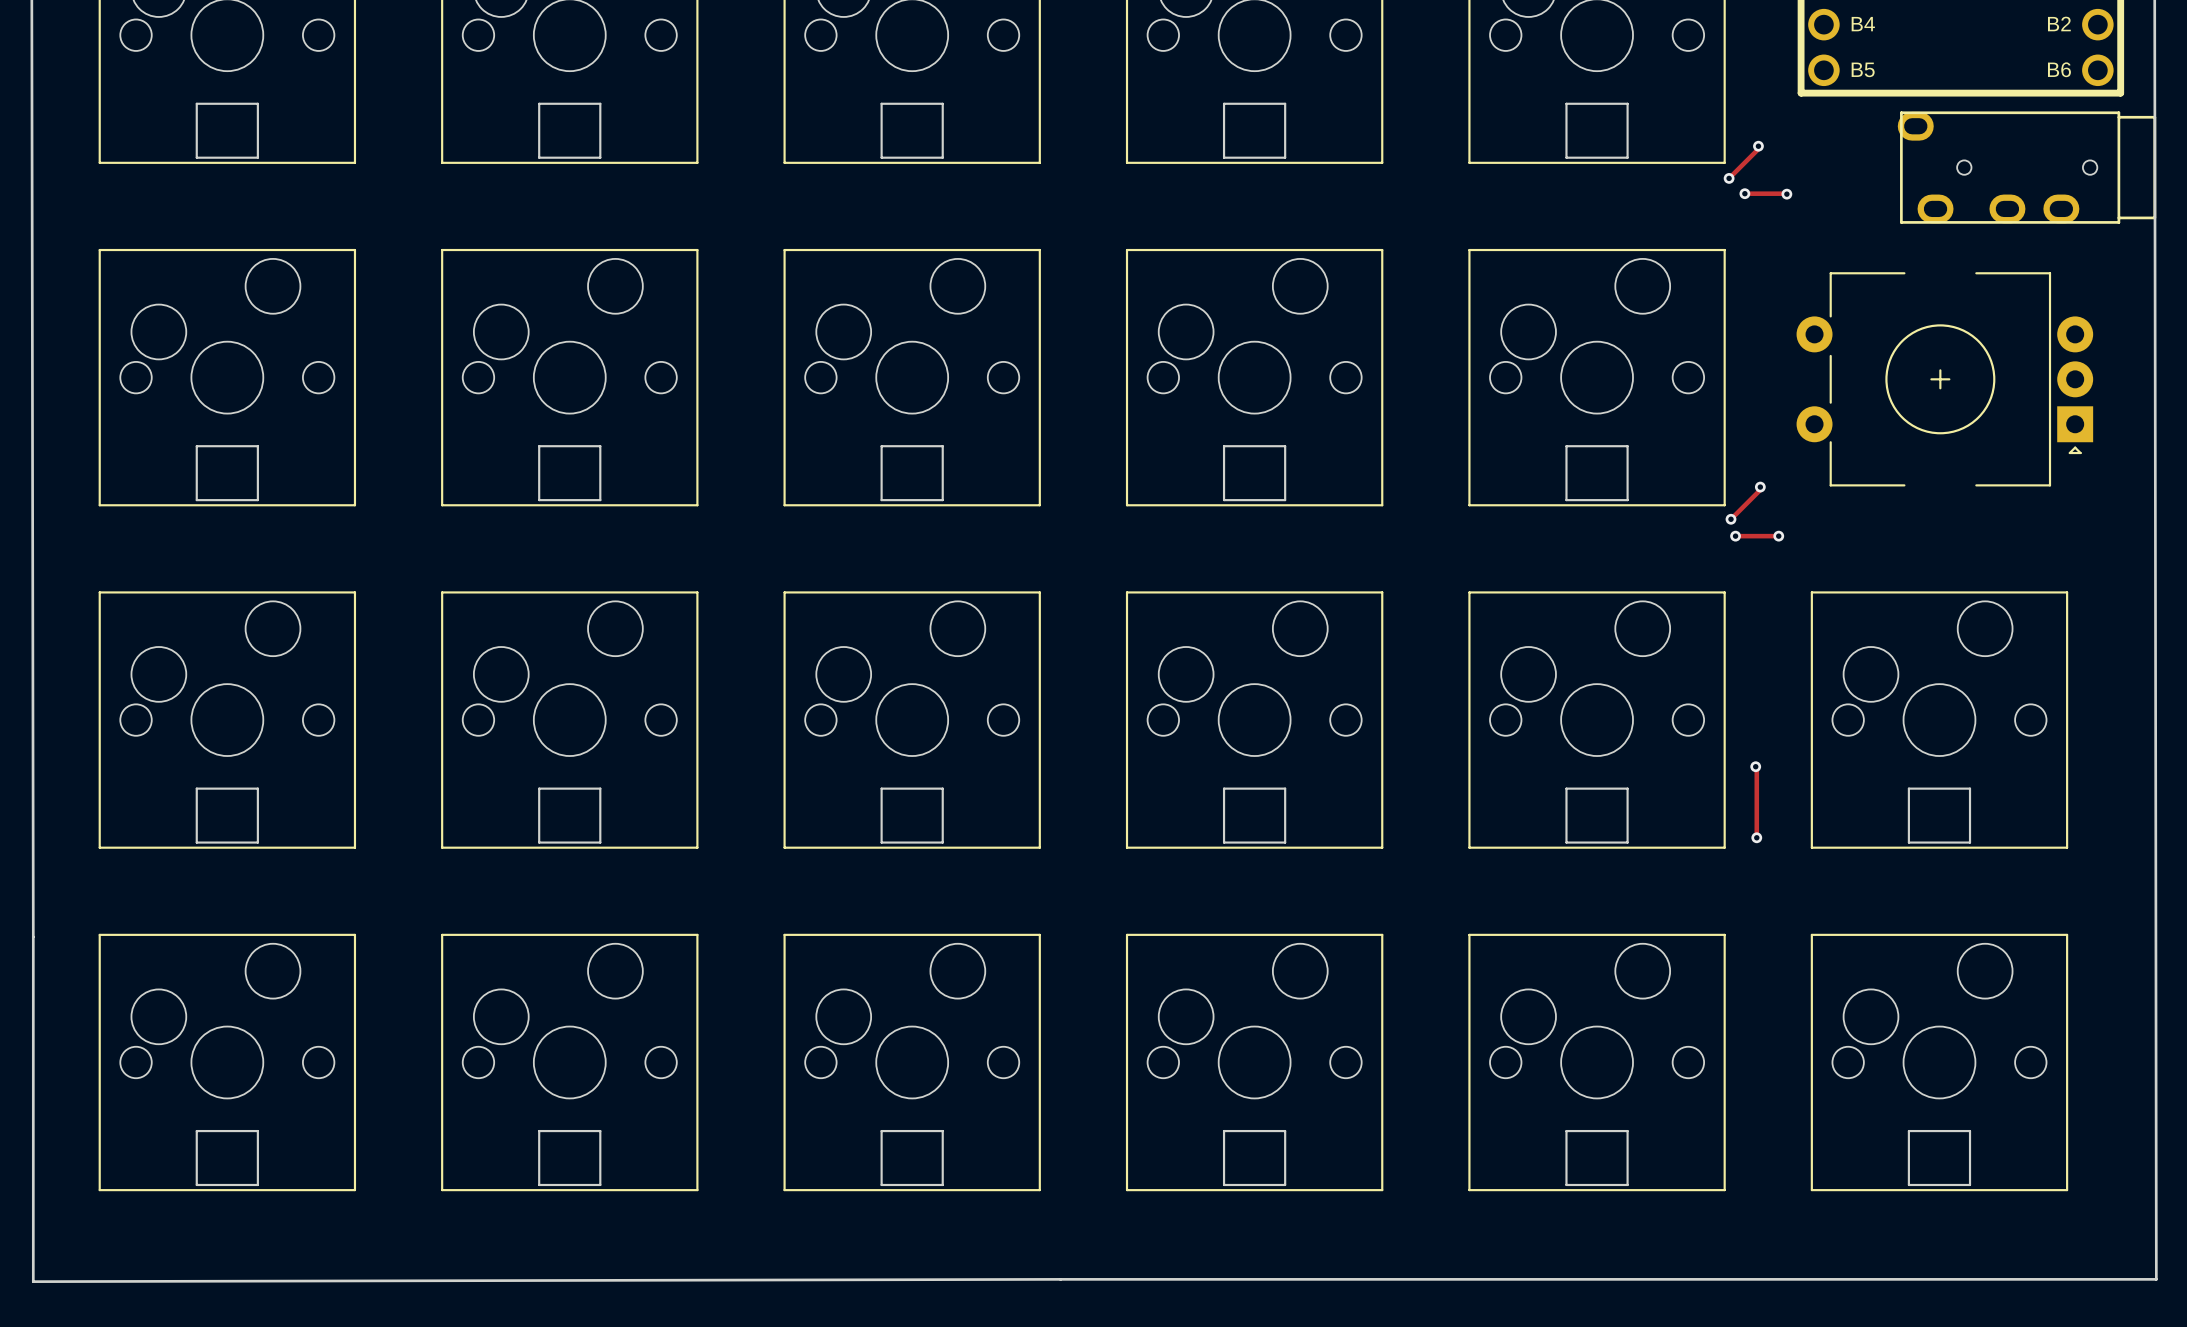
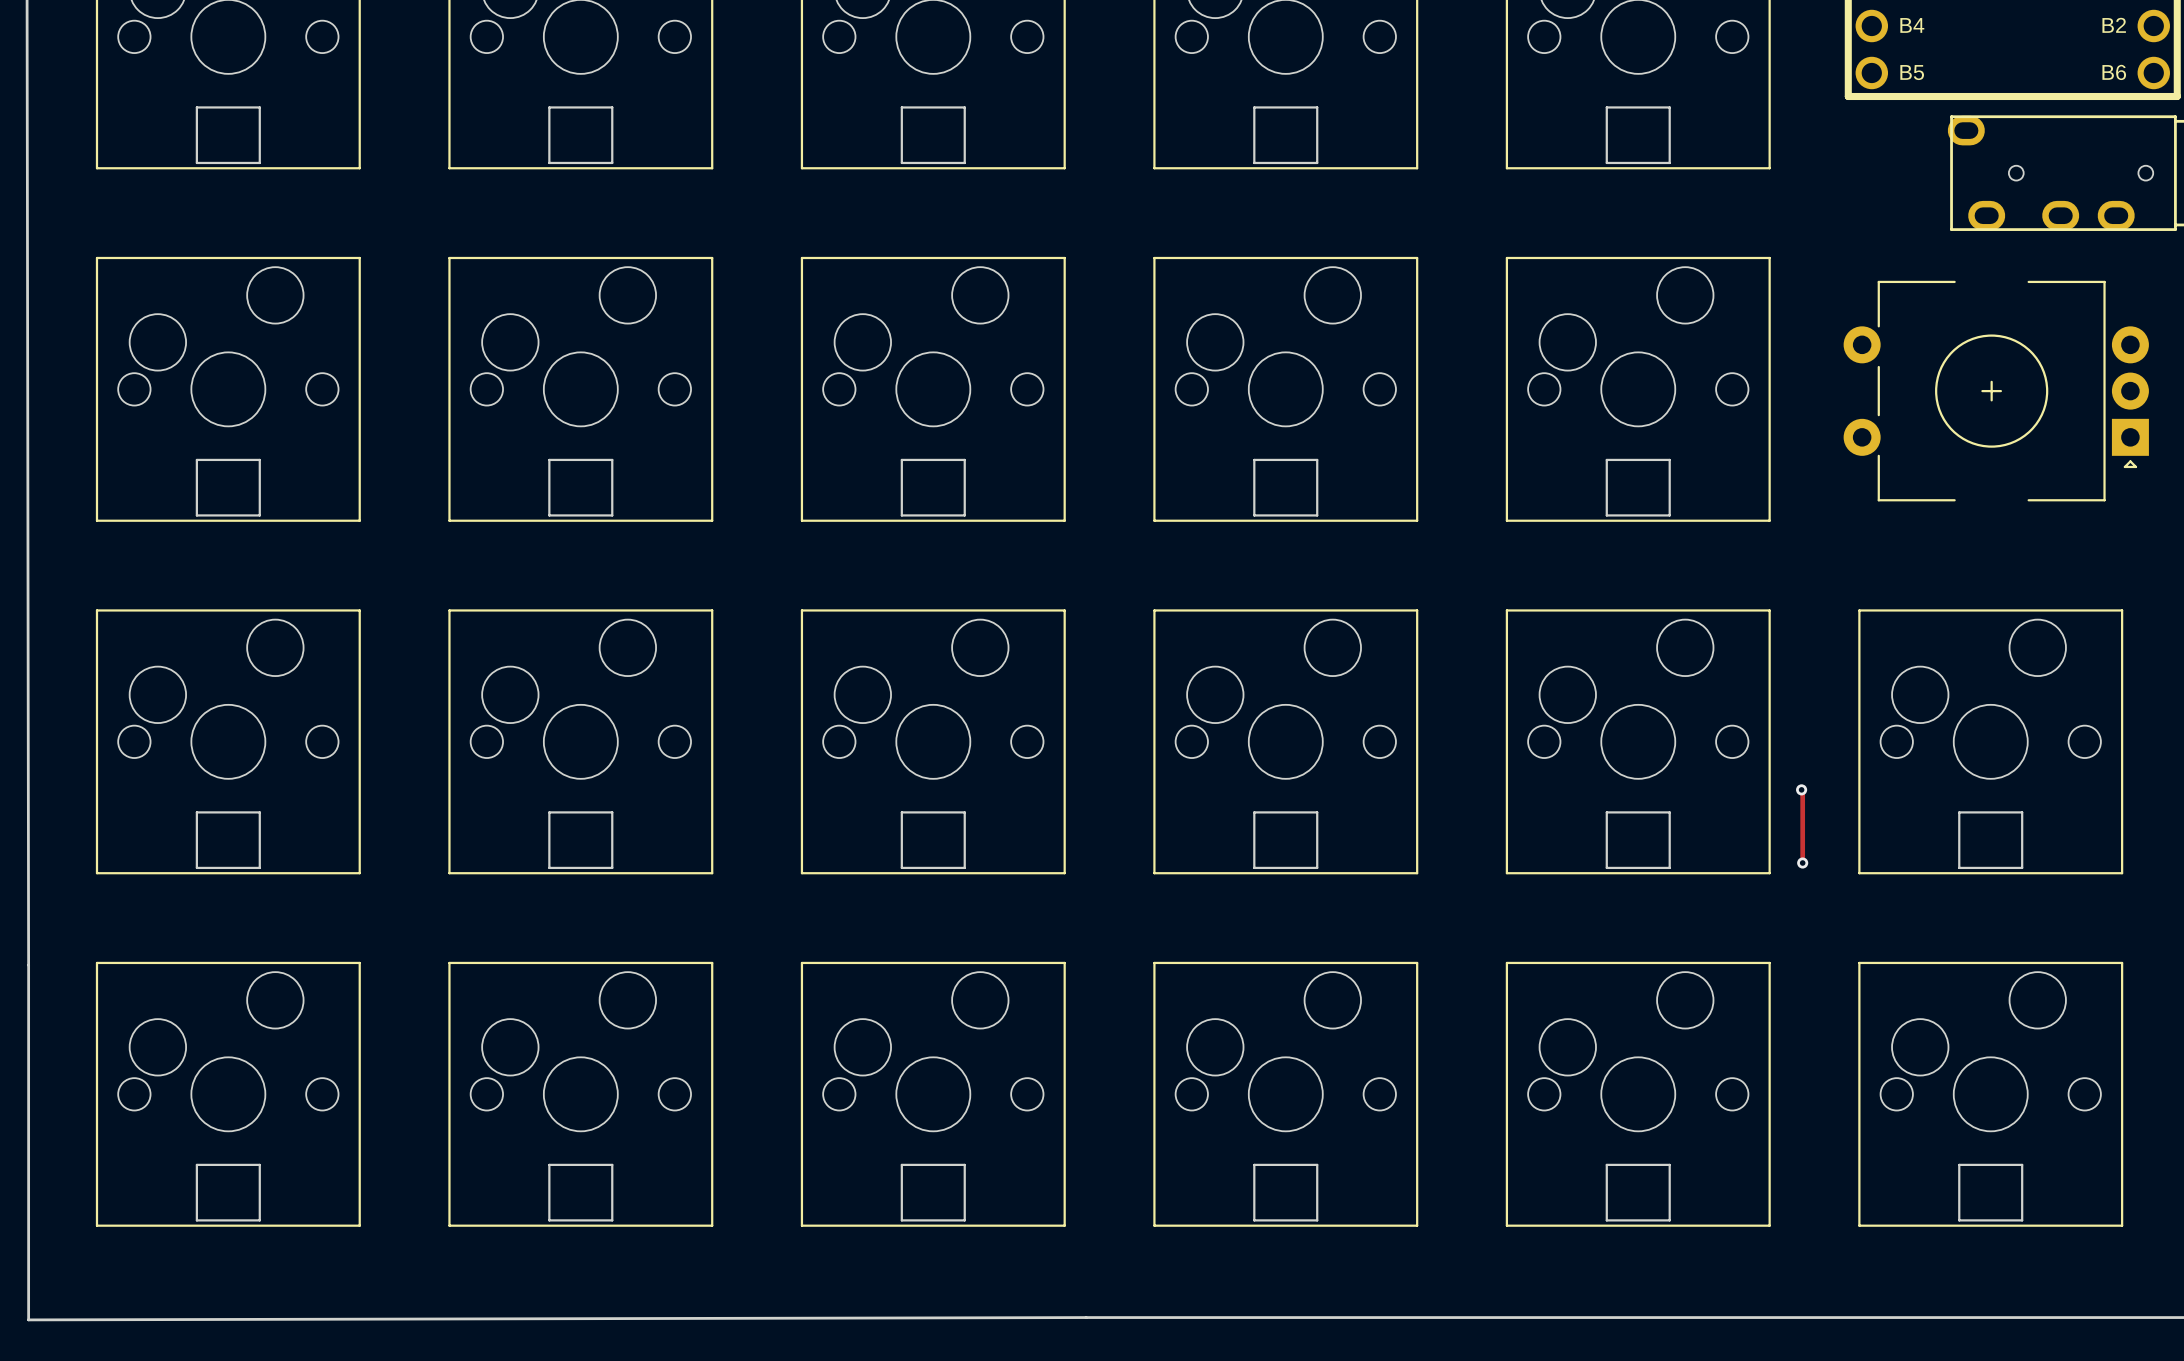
via: (1758, 146) -> none
track: (1758, 149) (1729, 178) -> none
via: (1729, 178) -> none
track: (1744, 193) (1786, 194) -> none
via: (1744, 193) -> none
via: (1786, 194) -> none
track: (1760, 487) (1760, 489) (1731, 519) -> none
via: (1760, 487) -> none
via: (1731, 519) -> none
track: (1735, 536) (1778, 536) -> none
via: (1735, 536) -> none
via: (1778, 536) -> none

